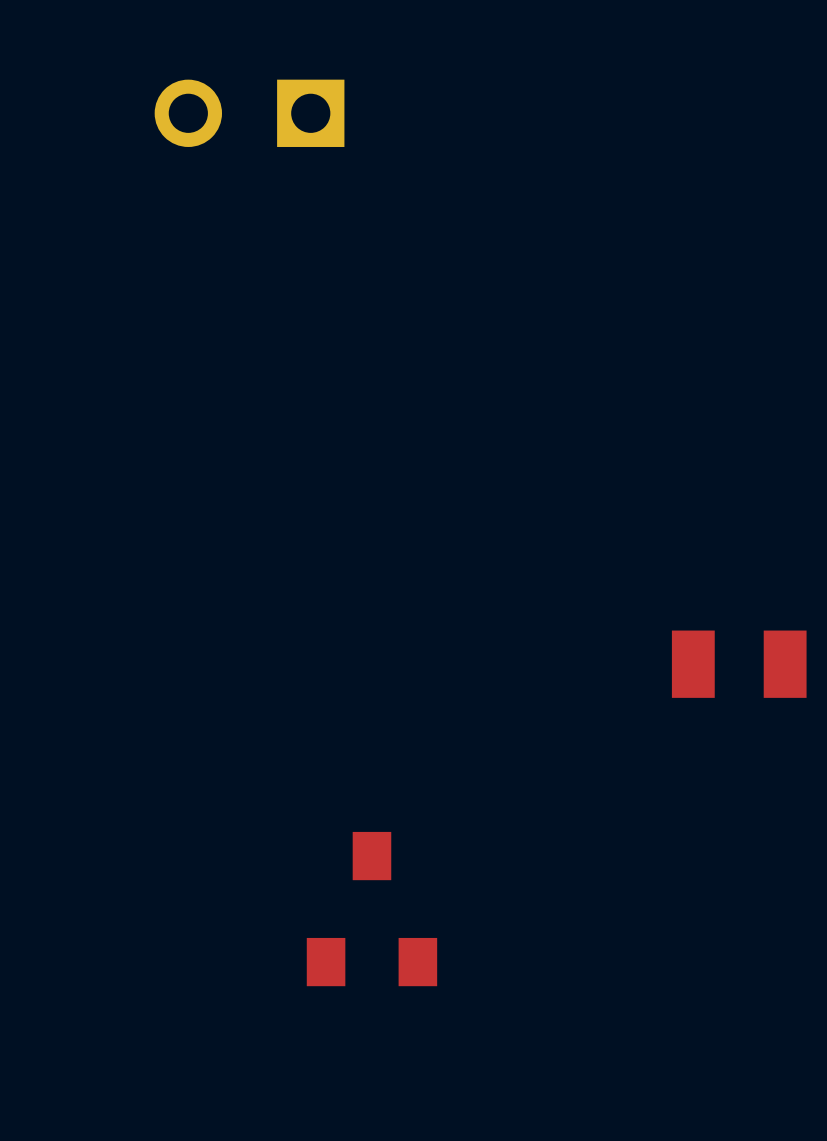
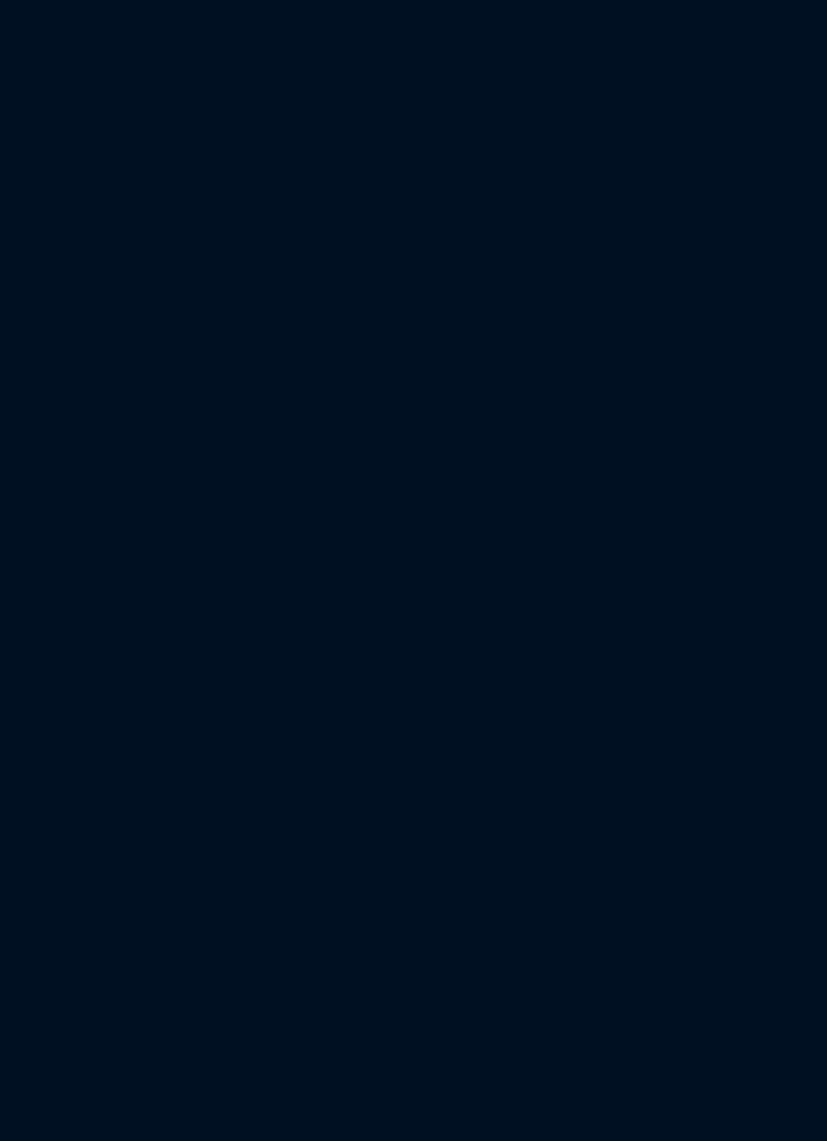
part: (249, 113) -> none
part: (739, 664) -> none
part: (371, 909) -> none

